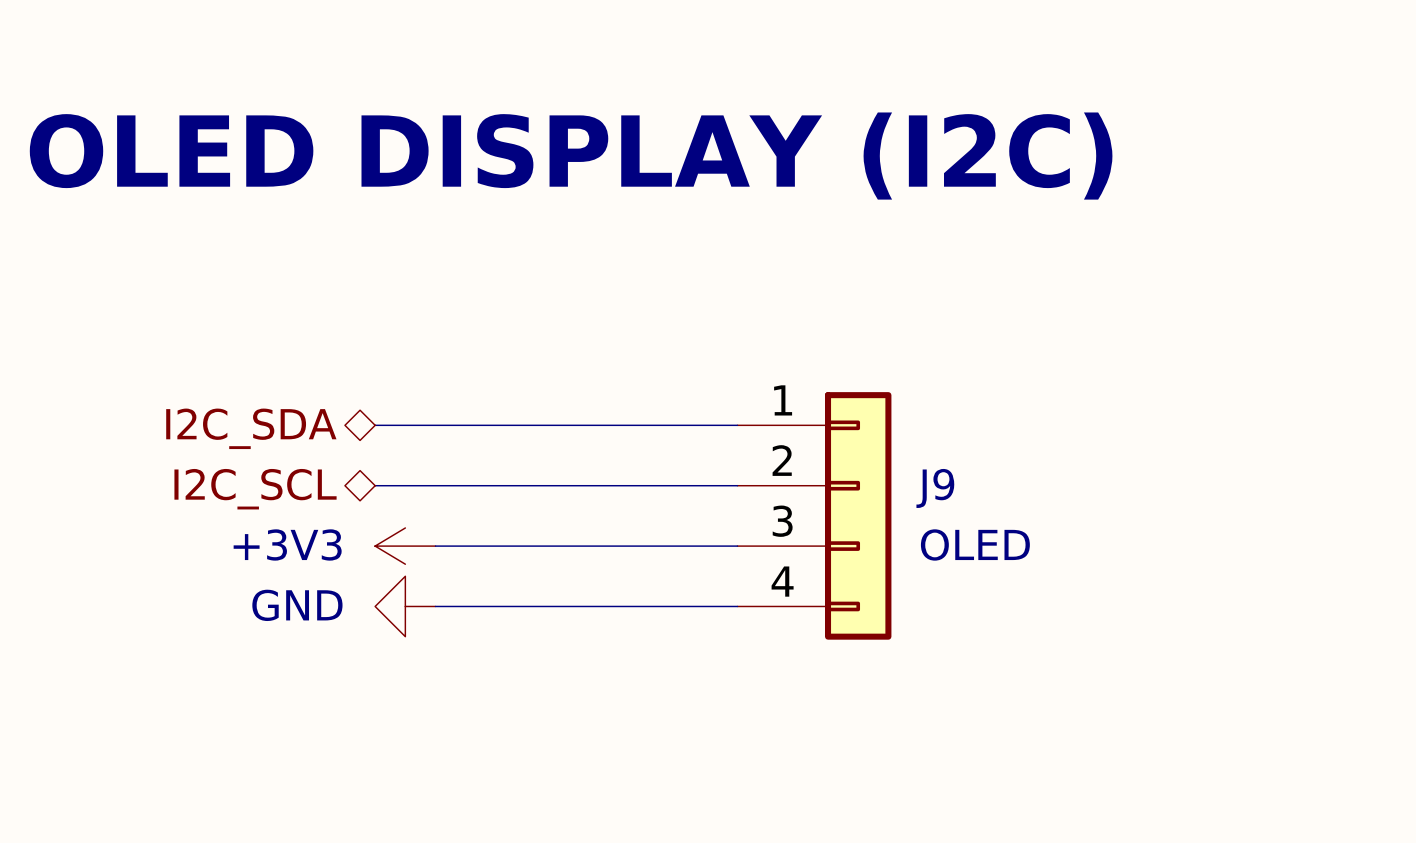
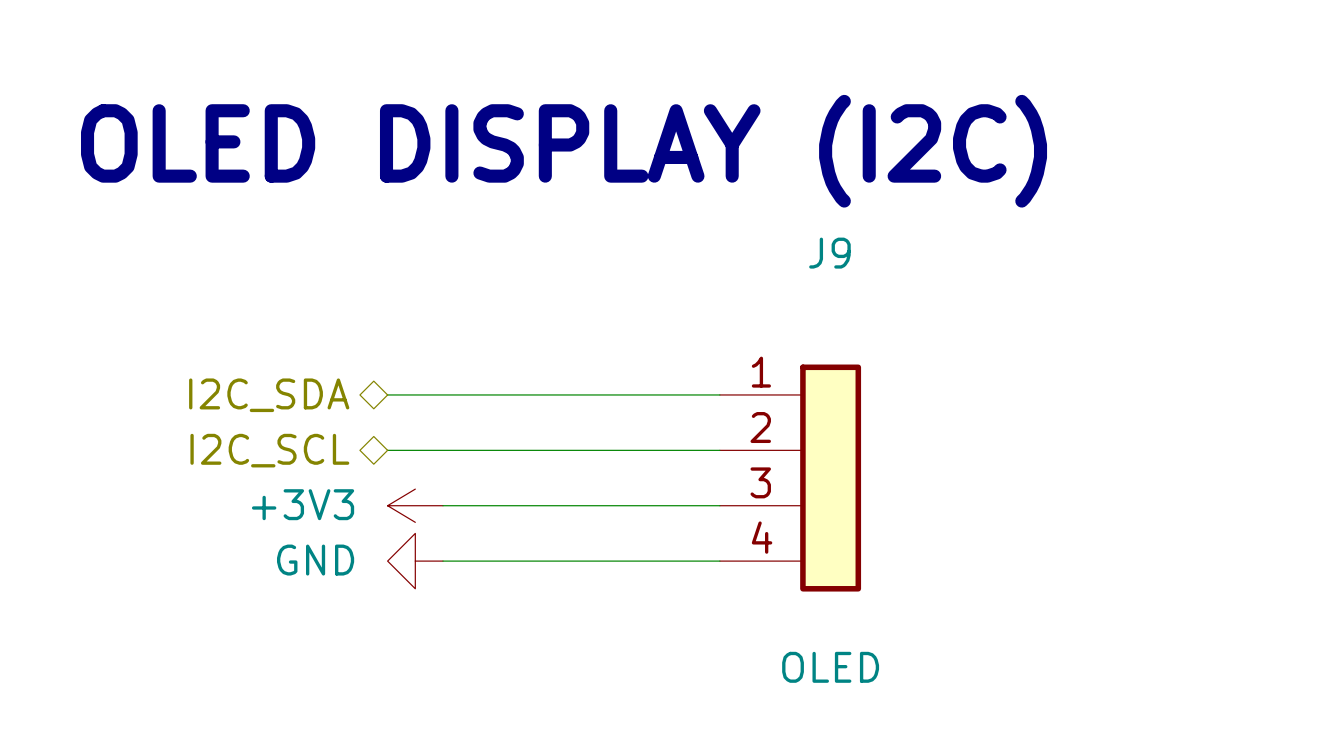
J9 symbol: [737, 392, 892, 640] -> [719, 364, 862, 592]
J9 name position: J9 (935, 488) -> J9 (829, 253)
J9 value position: OLED (975, 544) -> OLED (830, 667)

